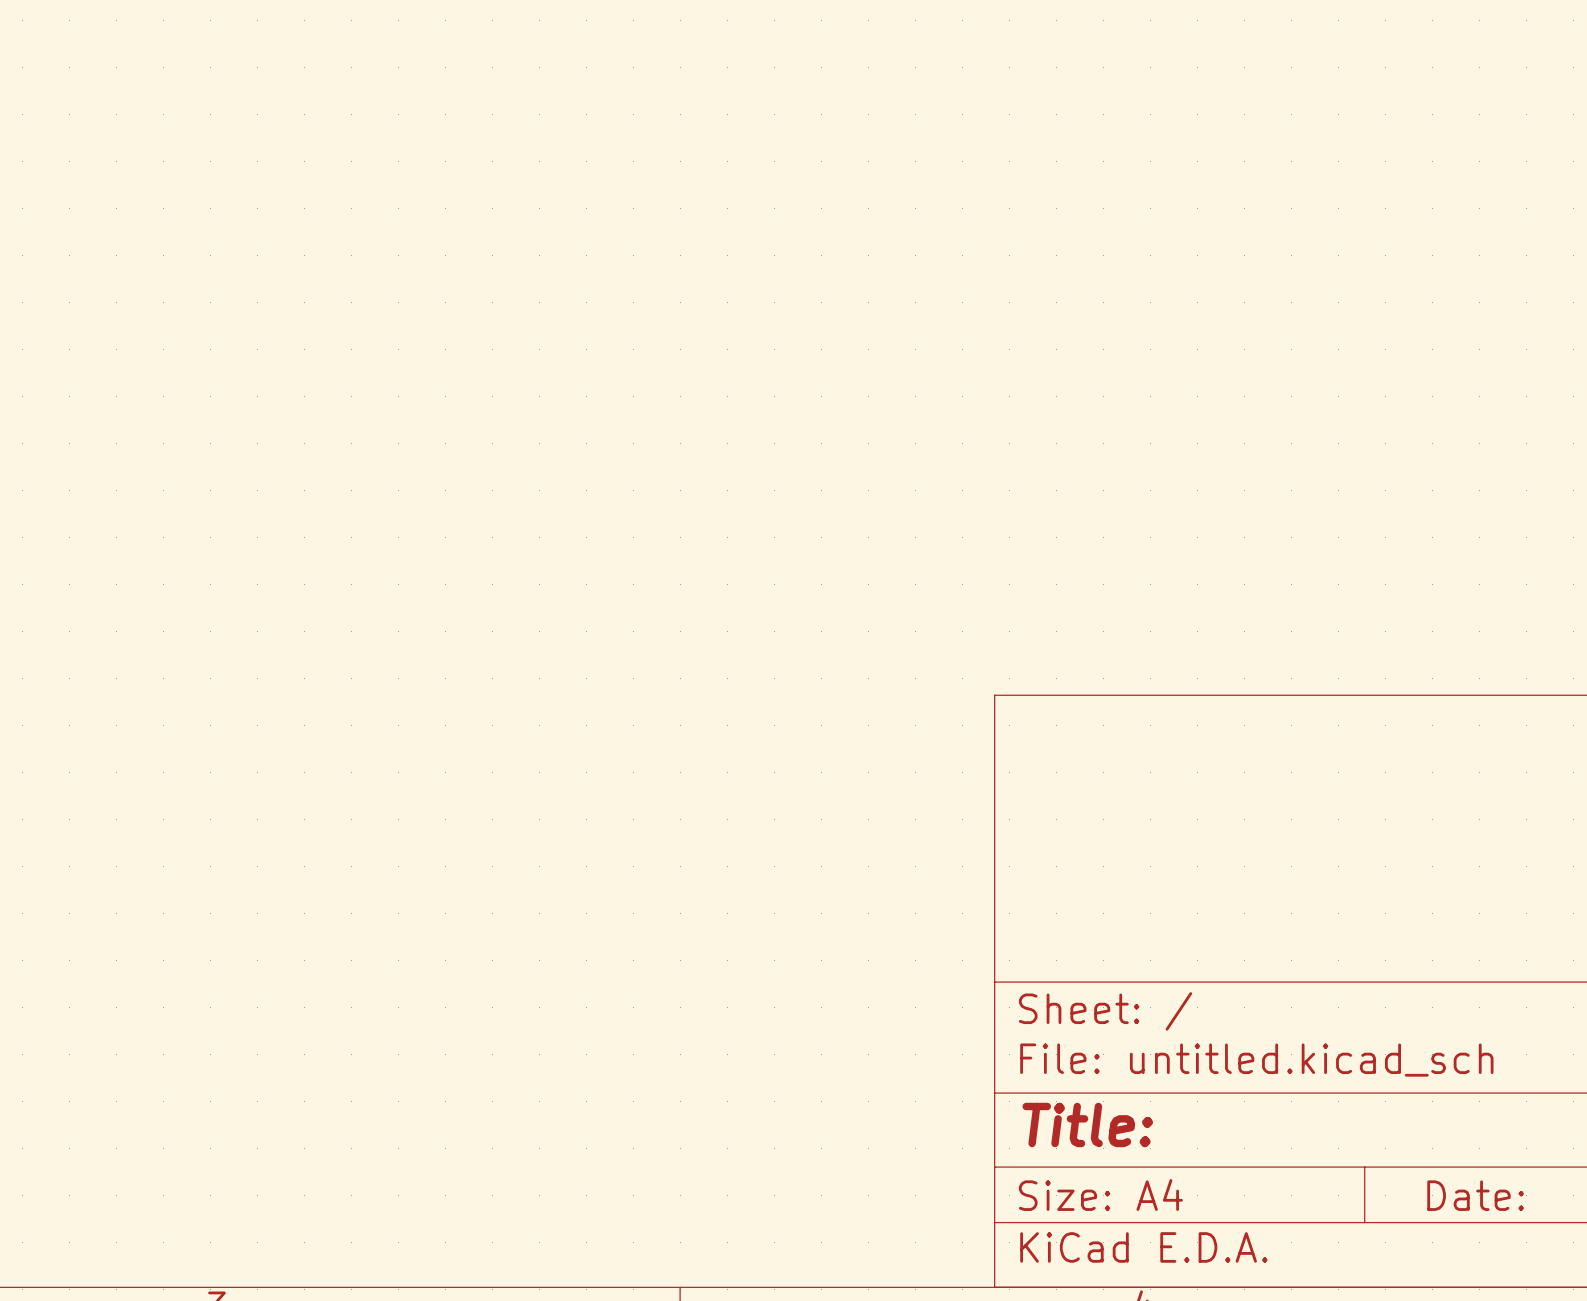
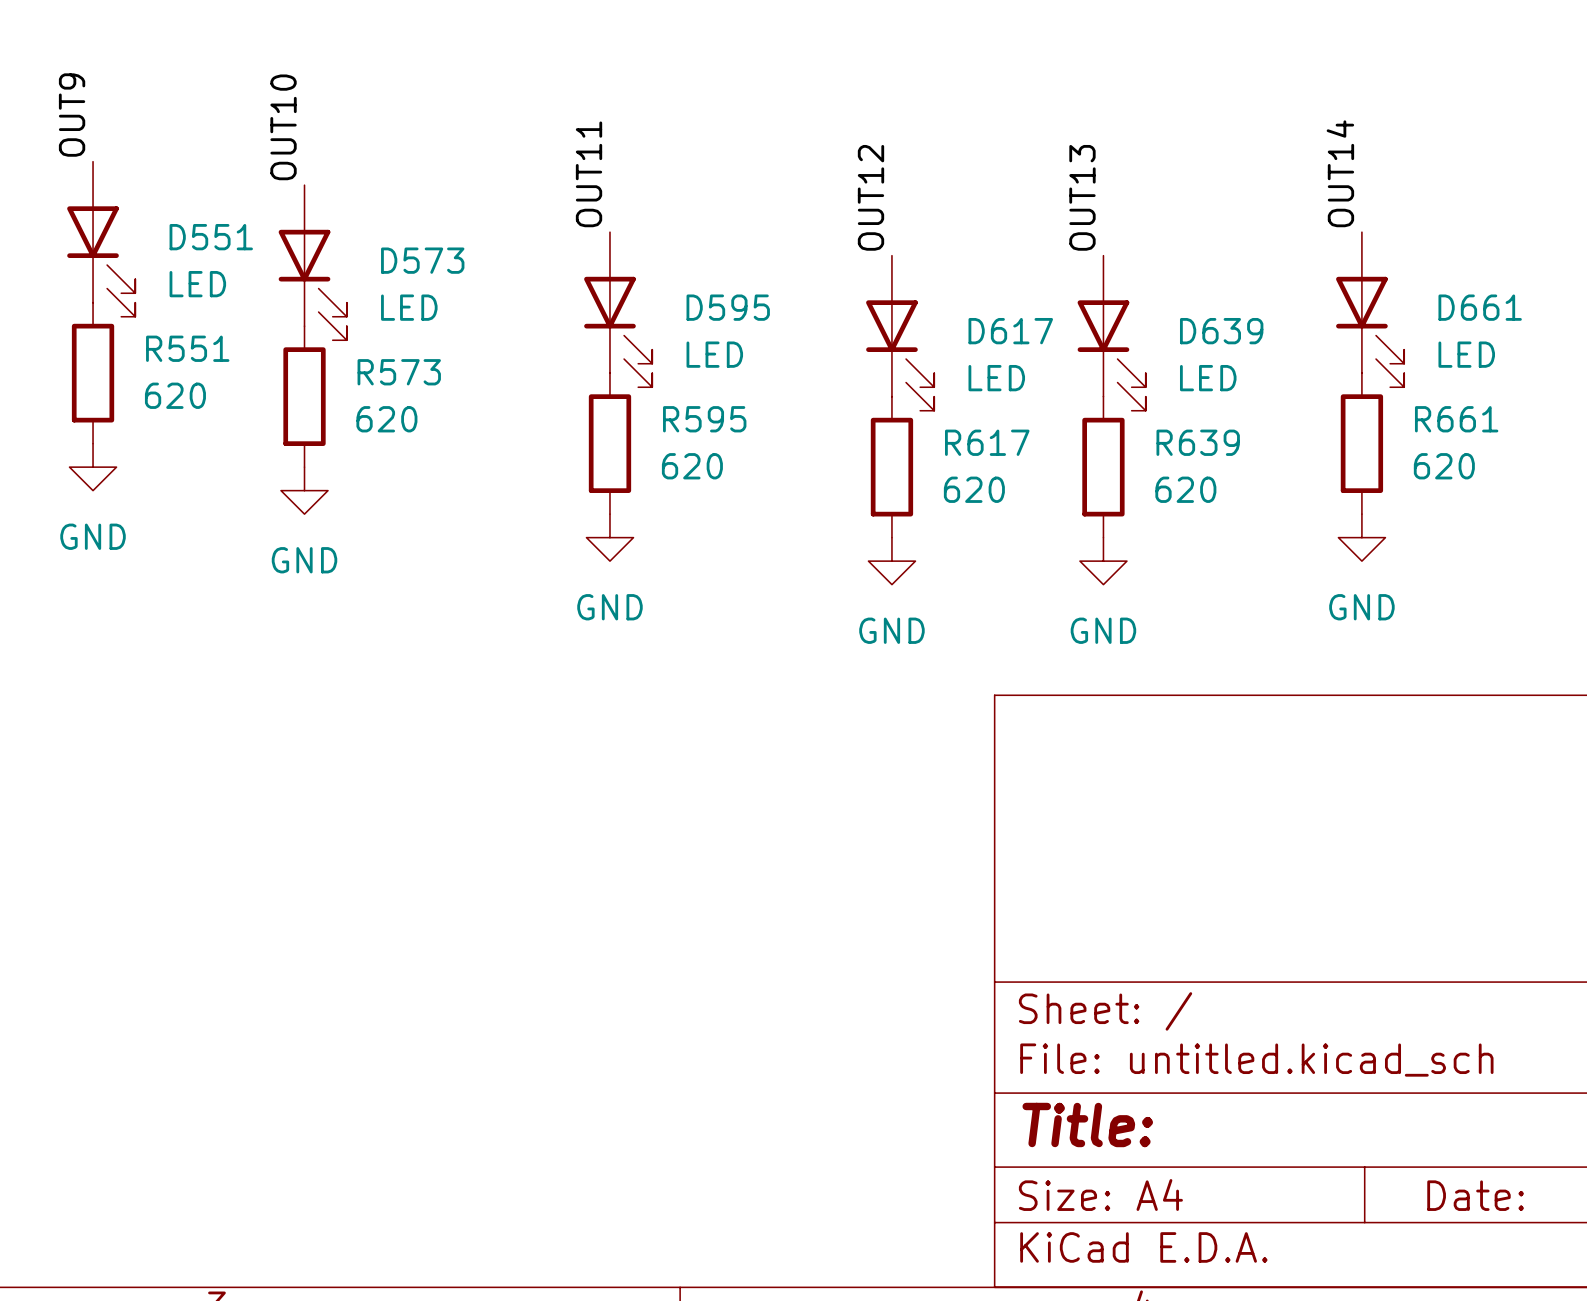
label: none -> OUT9 (72, 115)
label: none -> OUT10 (283, 127)
label: none -> OUT14 (1340, 173)
label: none -> OUT11 (589, 174)
label: none -> OUT12 (870, 197)
label: none -> OUT13 (1082, 197)
D551: none -> LED (101, 239)
D573: none -> LED (312, 262)
D595: none -> LED (618, 309)
D661: none -> LED (1370, 309)
D617: none -> LED (900, 333)
D639: none -> LED (1111, 333)
R551: none -> 620 (93, 373)
R573: none -> 620 (304, 396)
R595: none -> 620 (609, 443)
R661: none -> 620 (1361, 443)
power symbol: none -> GND (93, 467)
R617: none -> 620 (891, 467)
R639: none -> 620 (1103, 467)
power symbol: none -> GND (304, 490)
power symbol: none -> GND (609, 537)
power symbol: none -> GND (1361, 537)
power symbol: none -> GND (891, 561)
power symbol: none -> GND (1103, 561)

